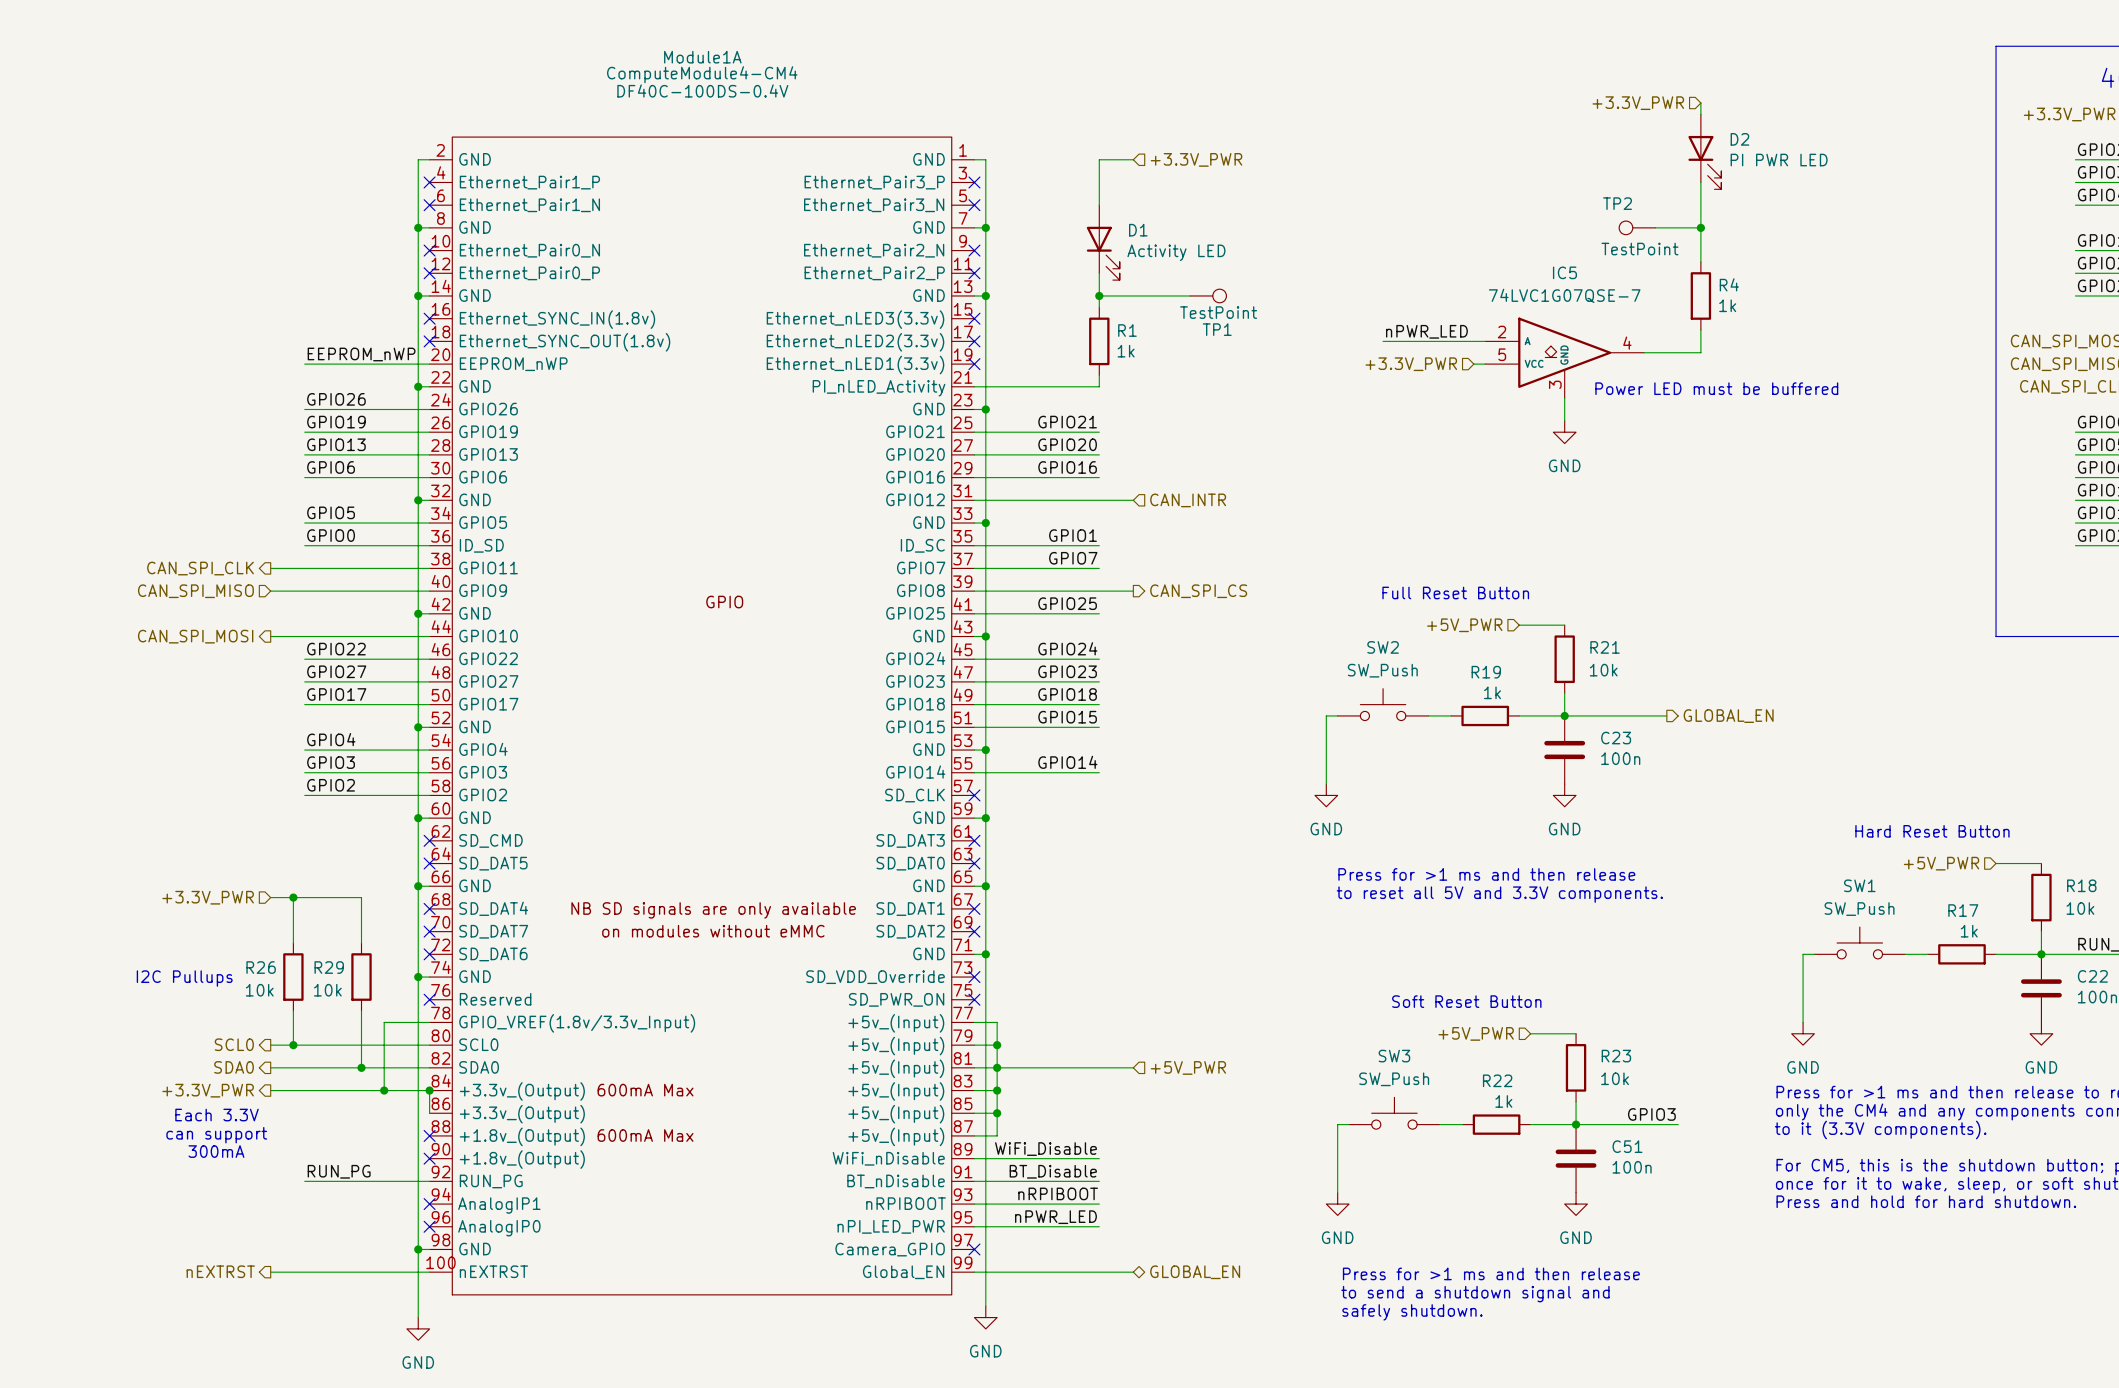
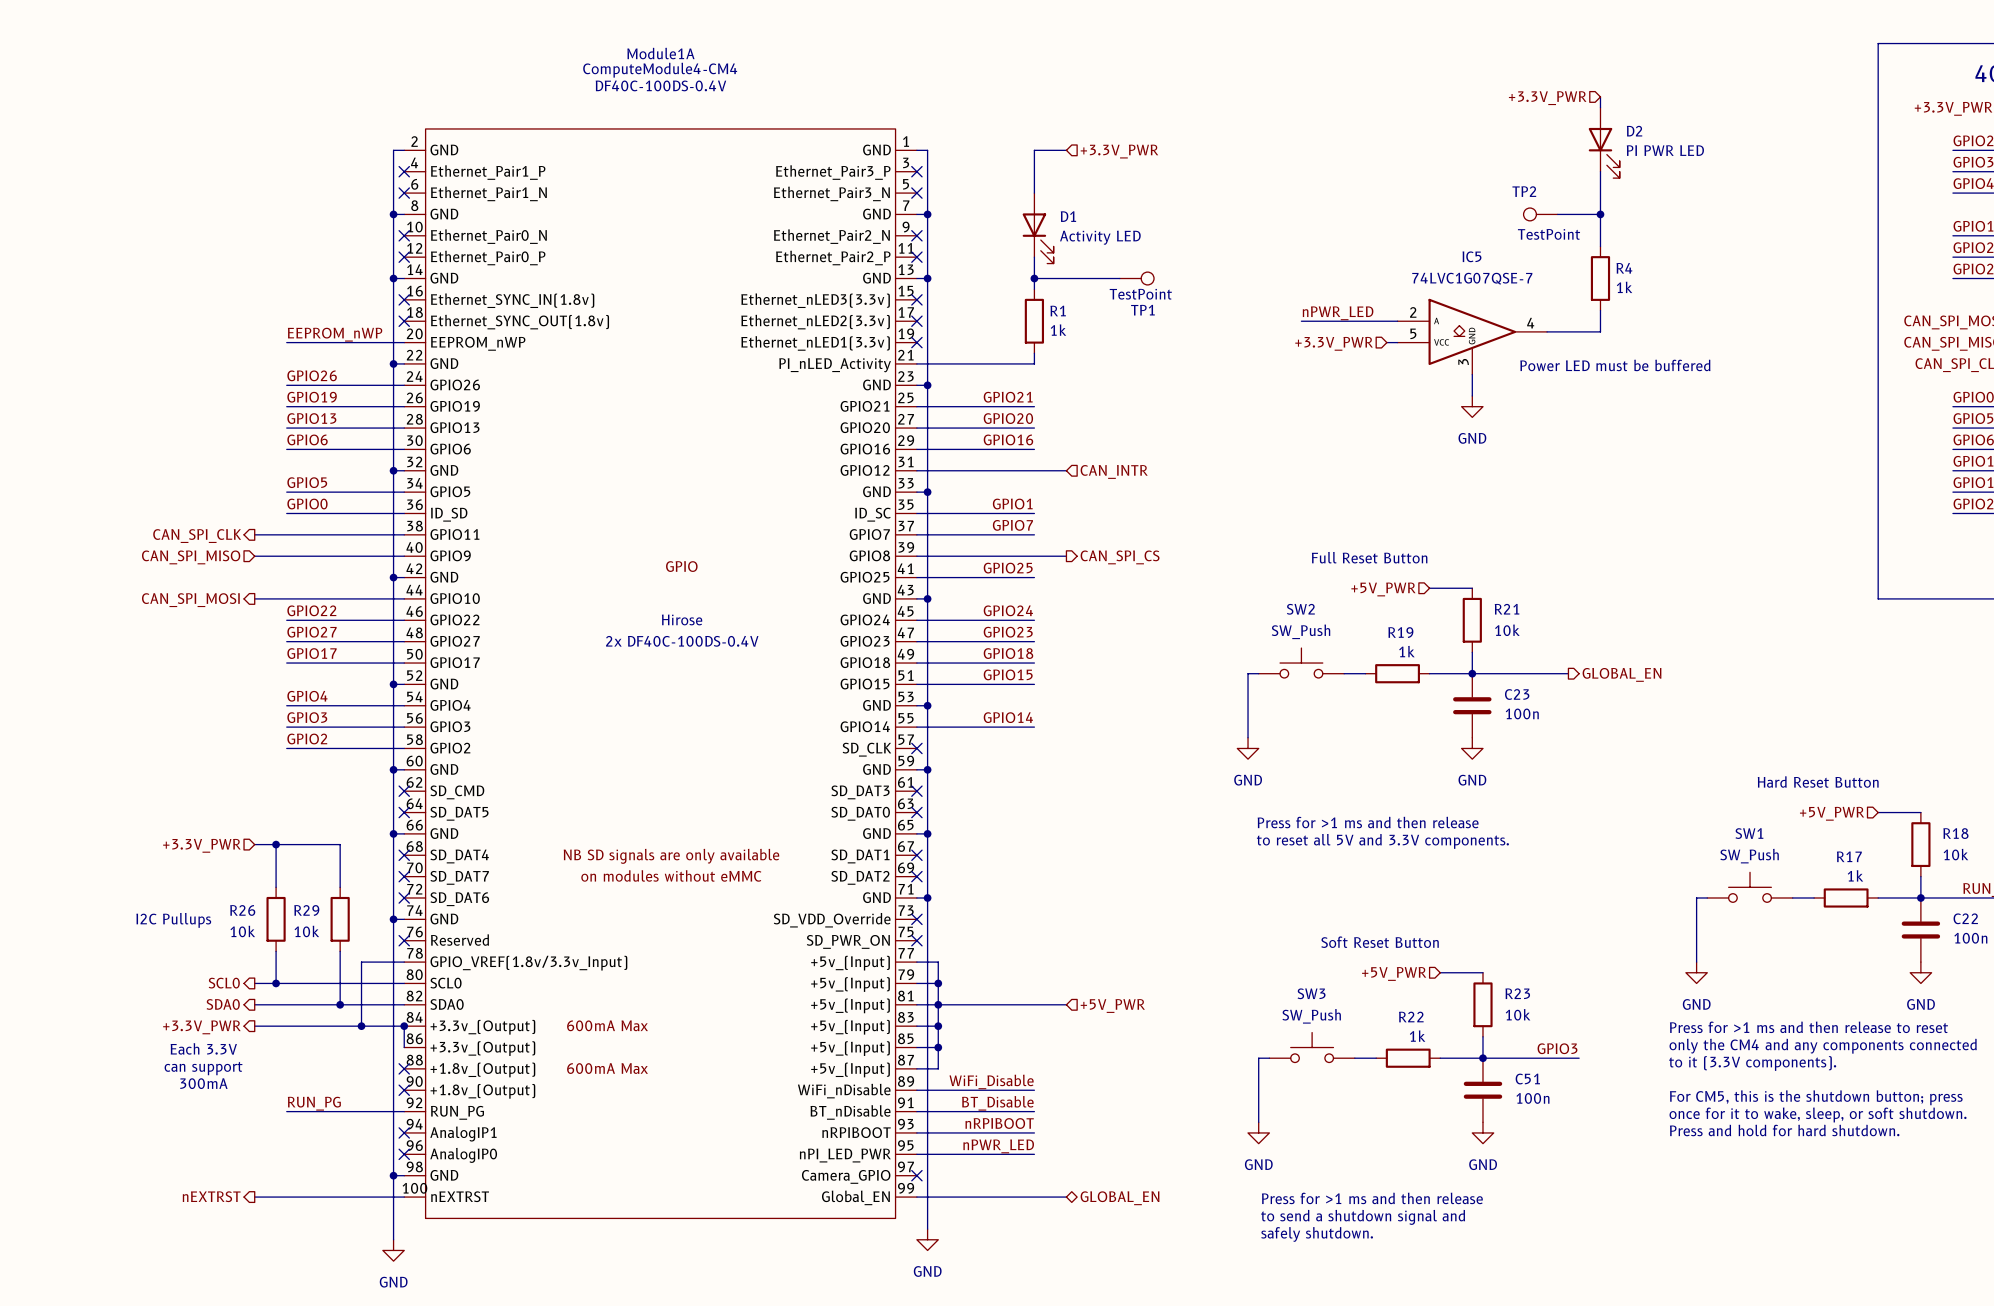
Module1A text: none -> Hirose (682, 619)
Module1A text: none -> 2x DF40C-100DS-0.4V (682, 641)

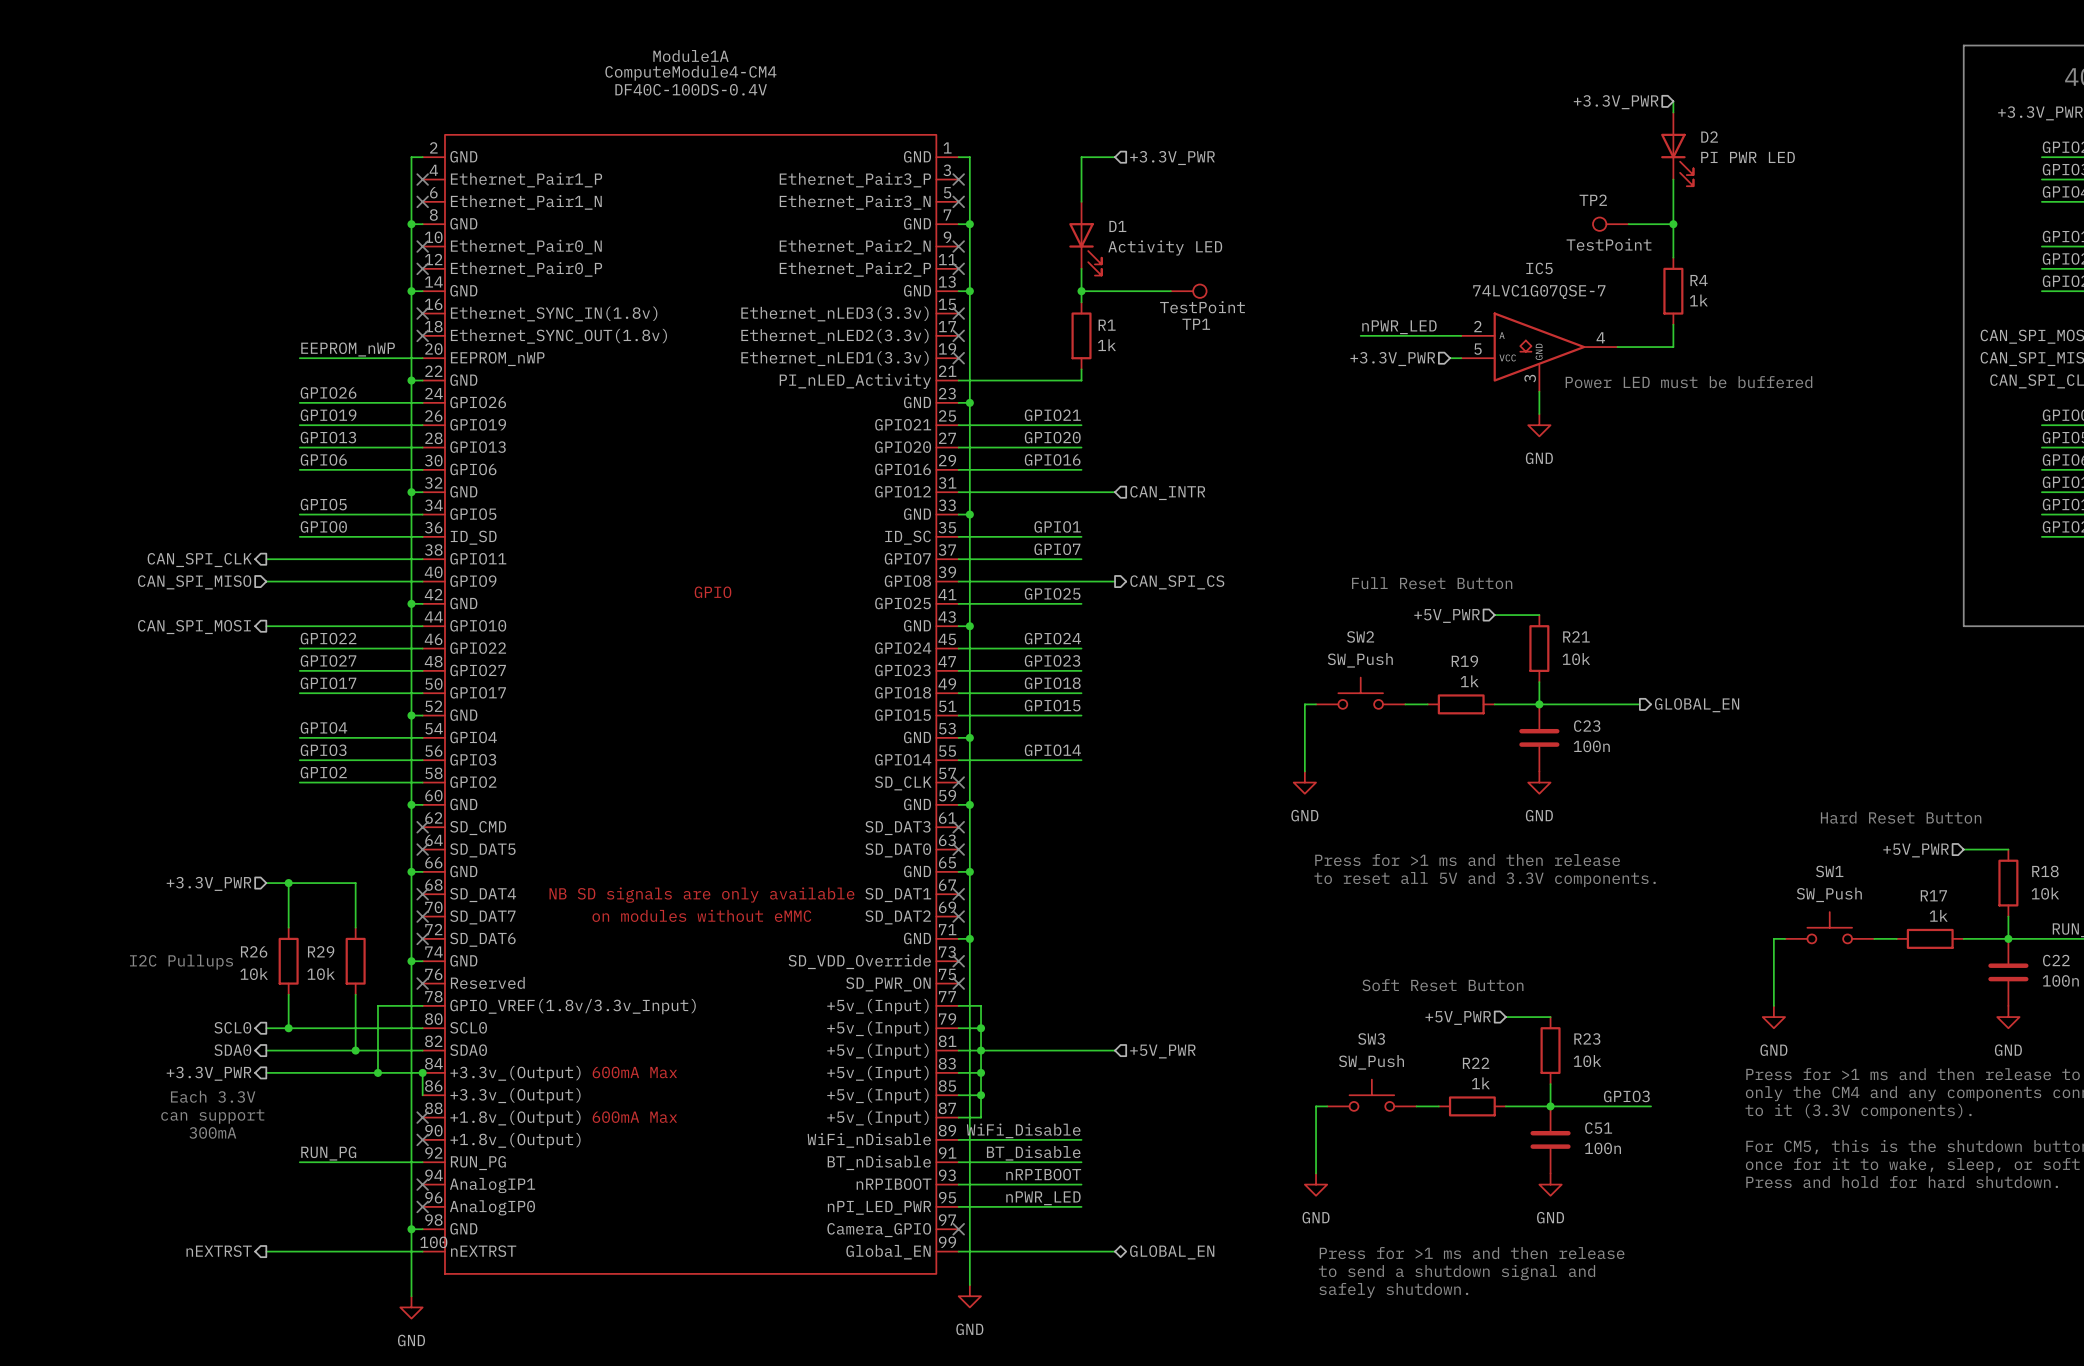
Module1A text: Hirose (682, 619) -> none
Module1A text: 2x DF40C-100DS-0.4V (682, 641) -> none

